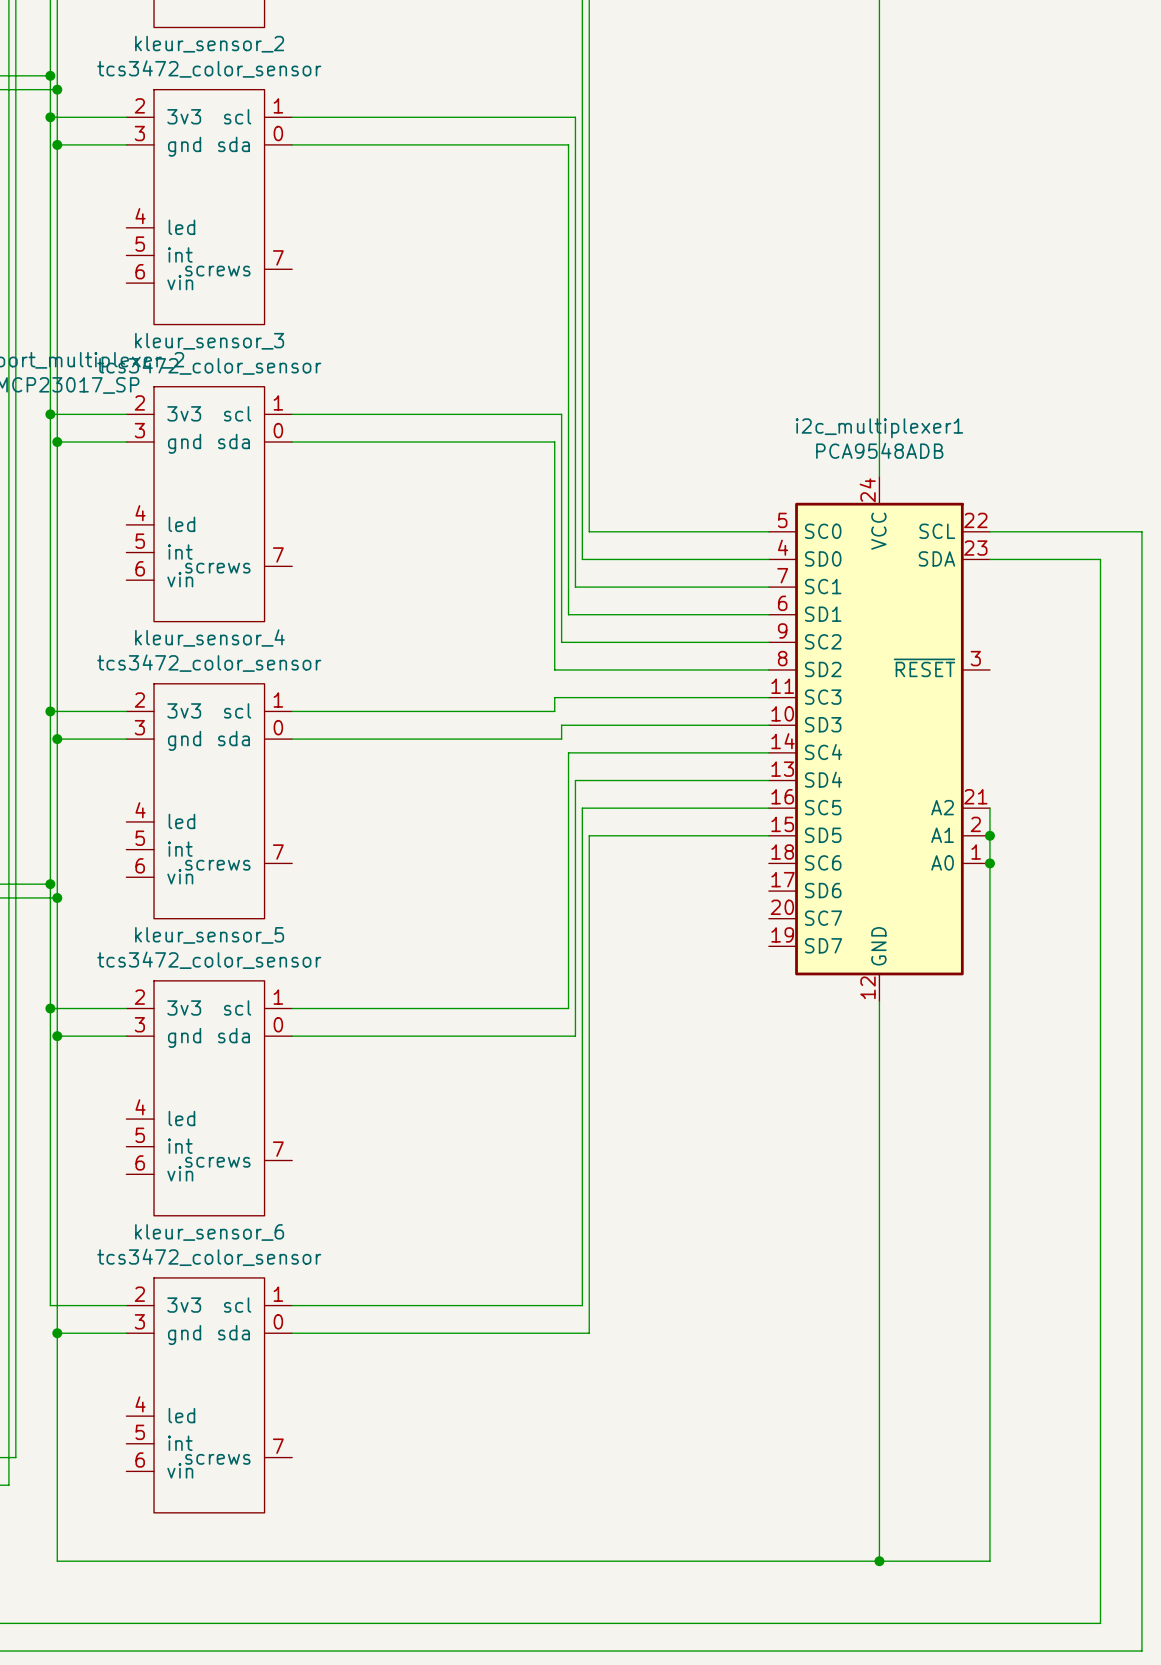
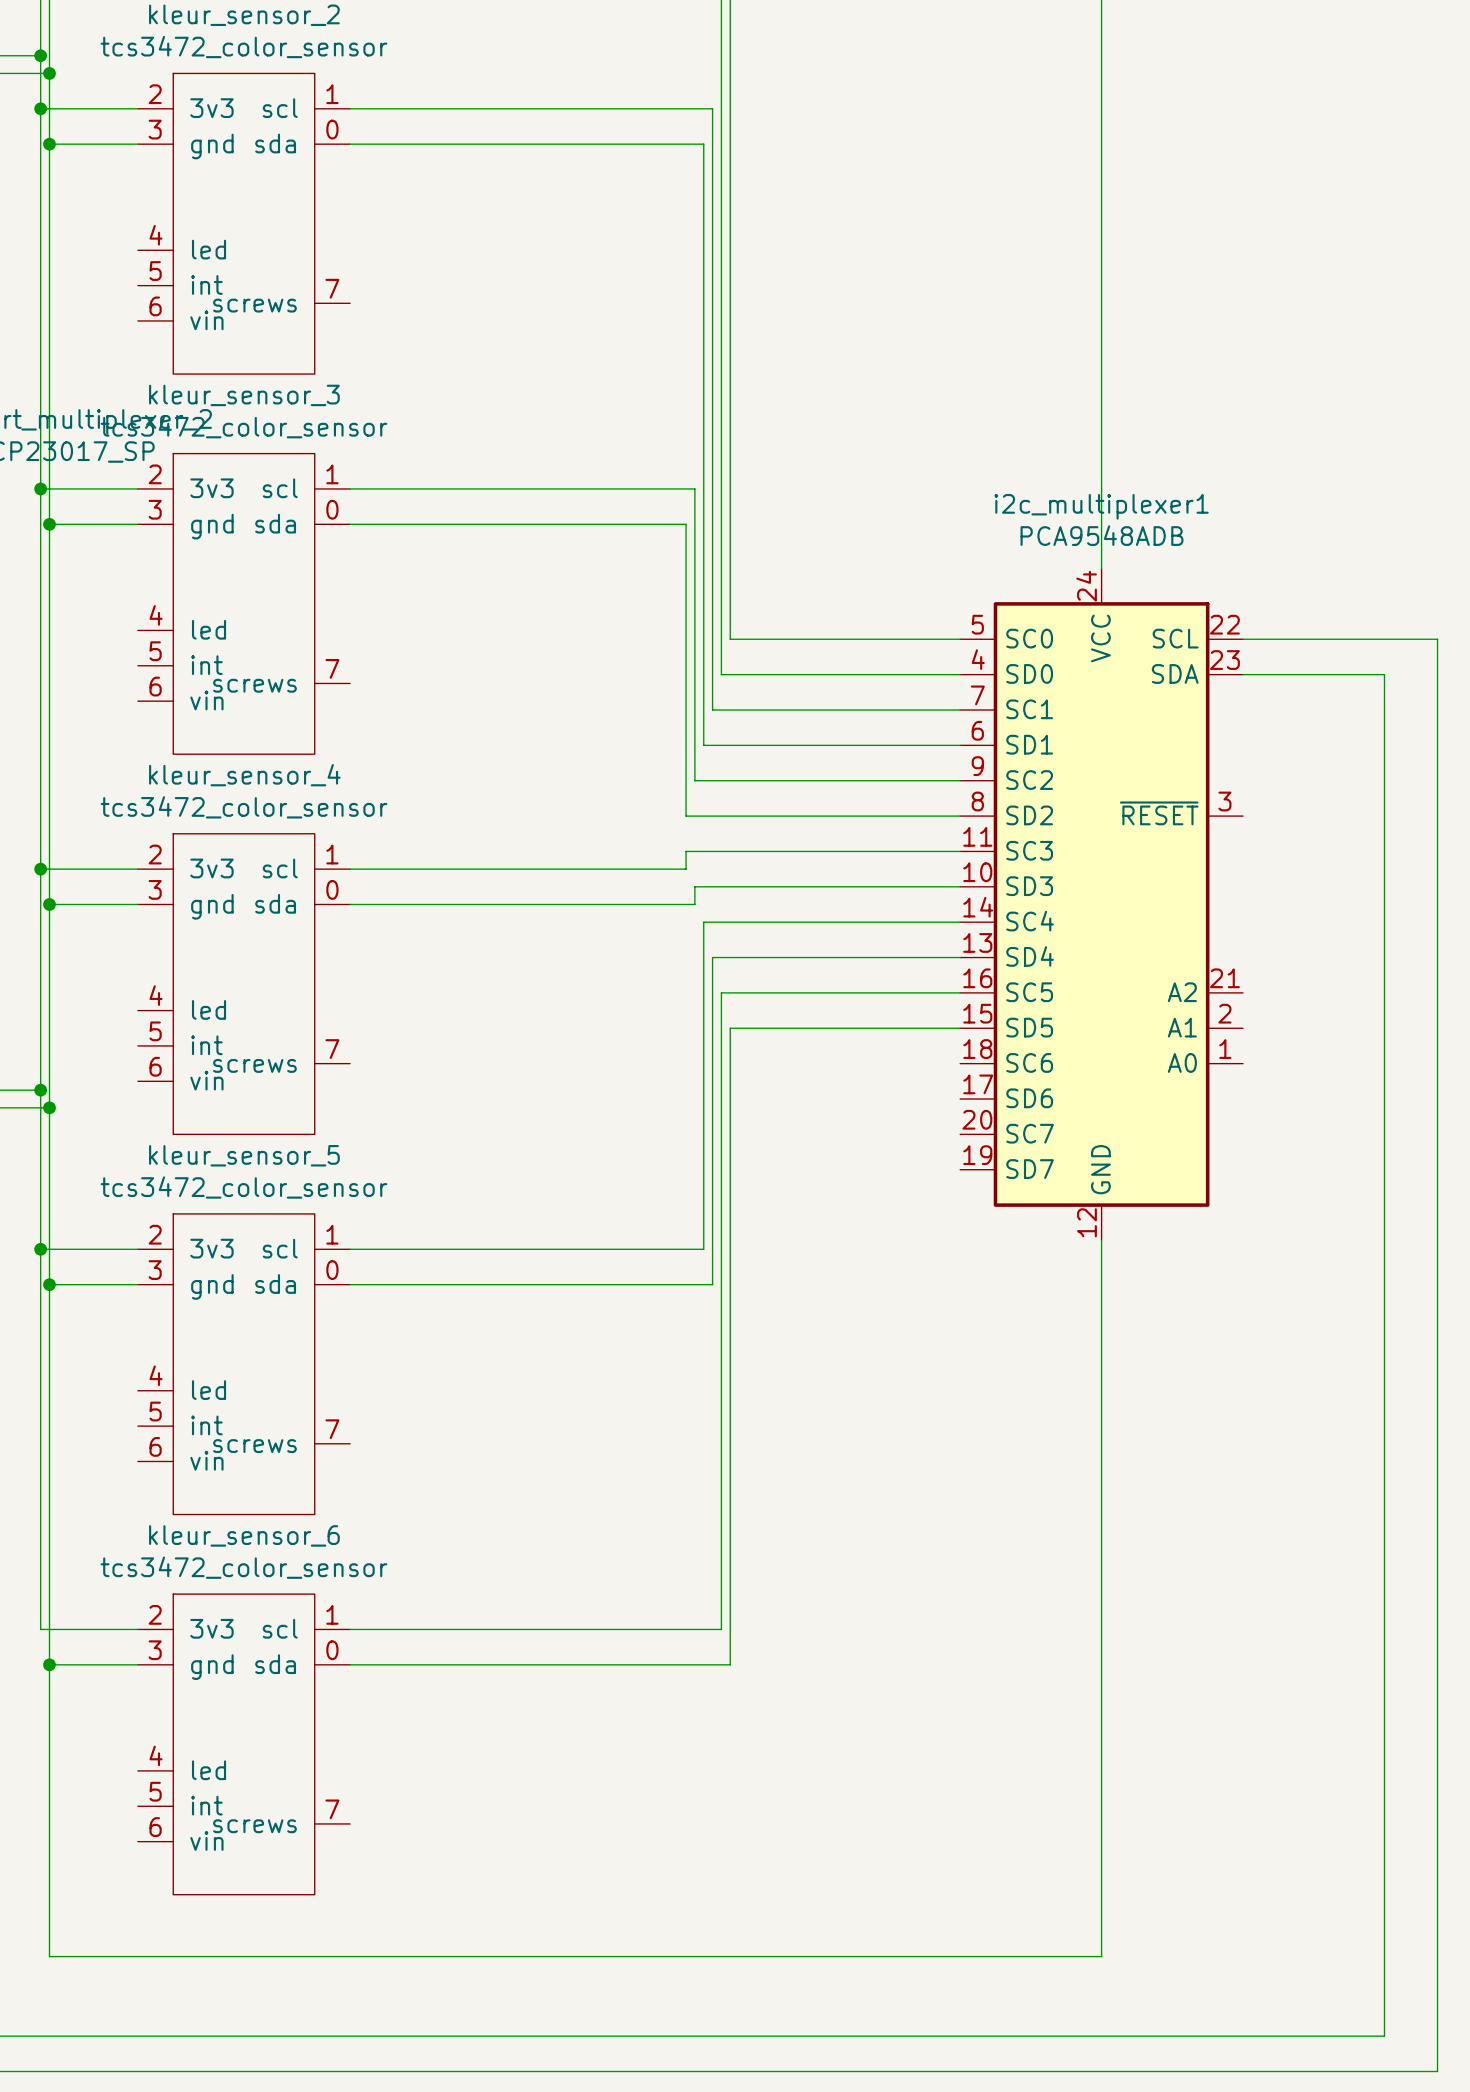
wire: (989, 808) (989, 1561) (879, 1561) -> none
junction: (989, 835) -> none
junction: (989, 863) -> none
junction: (879, 1561) -> none

